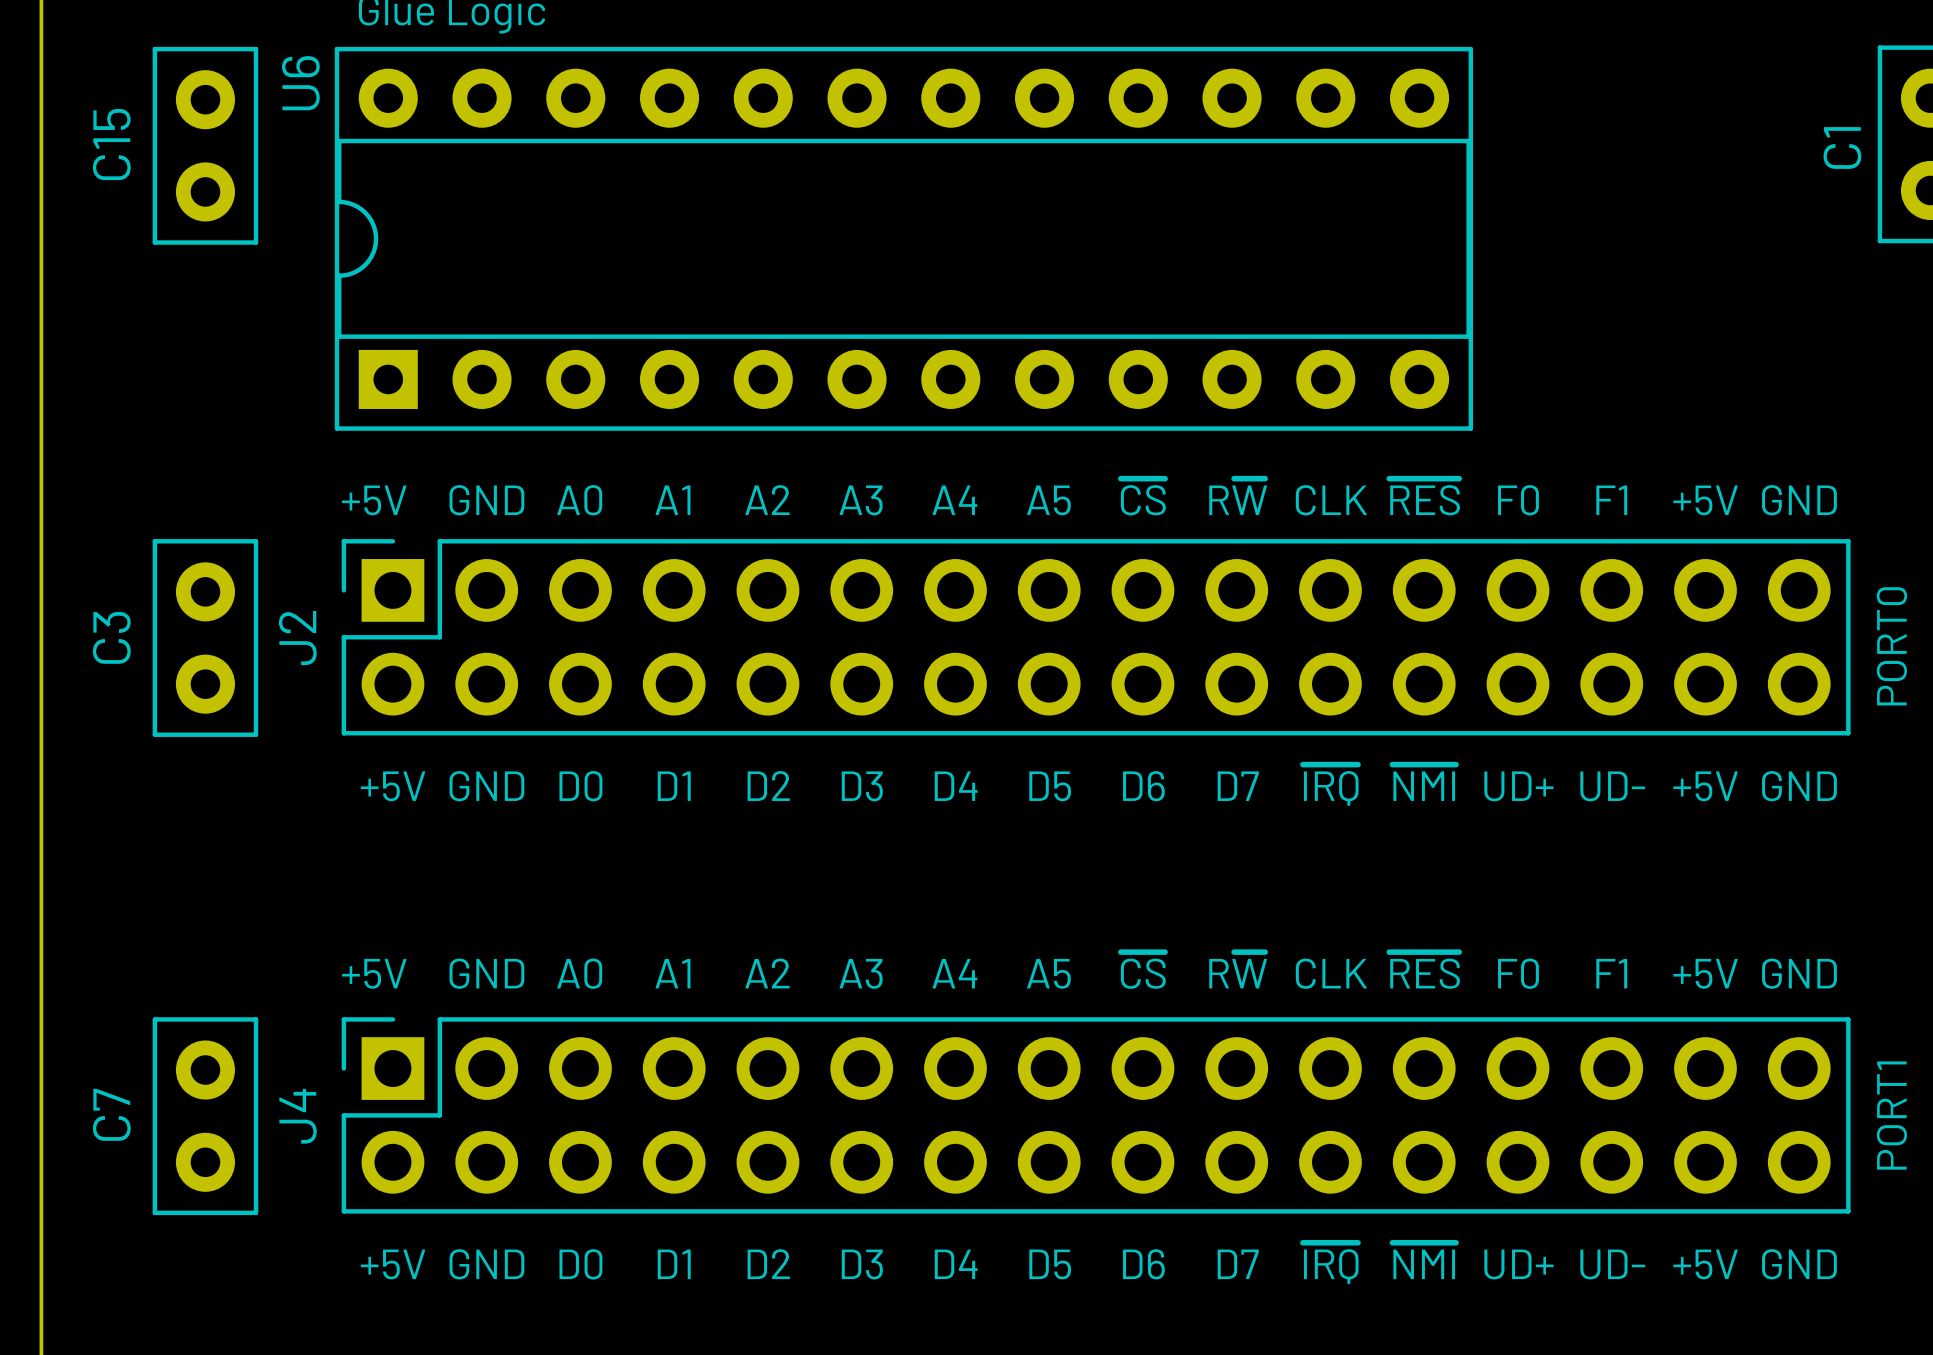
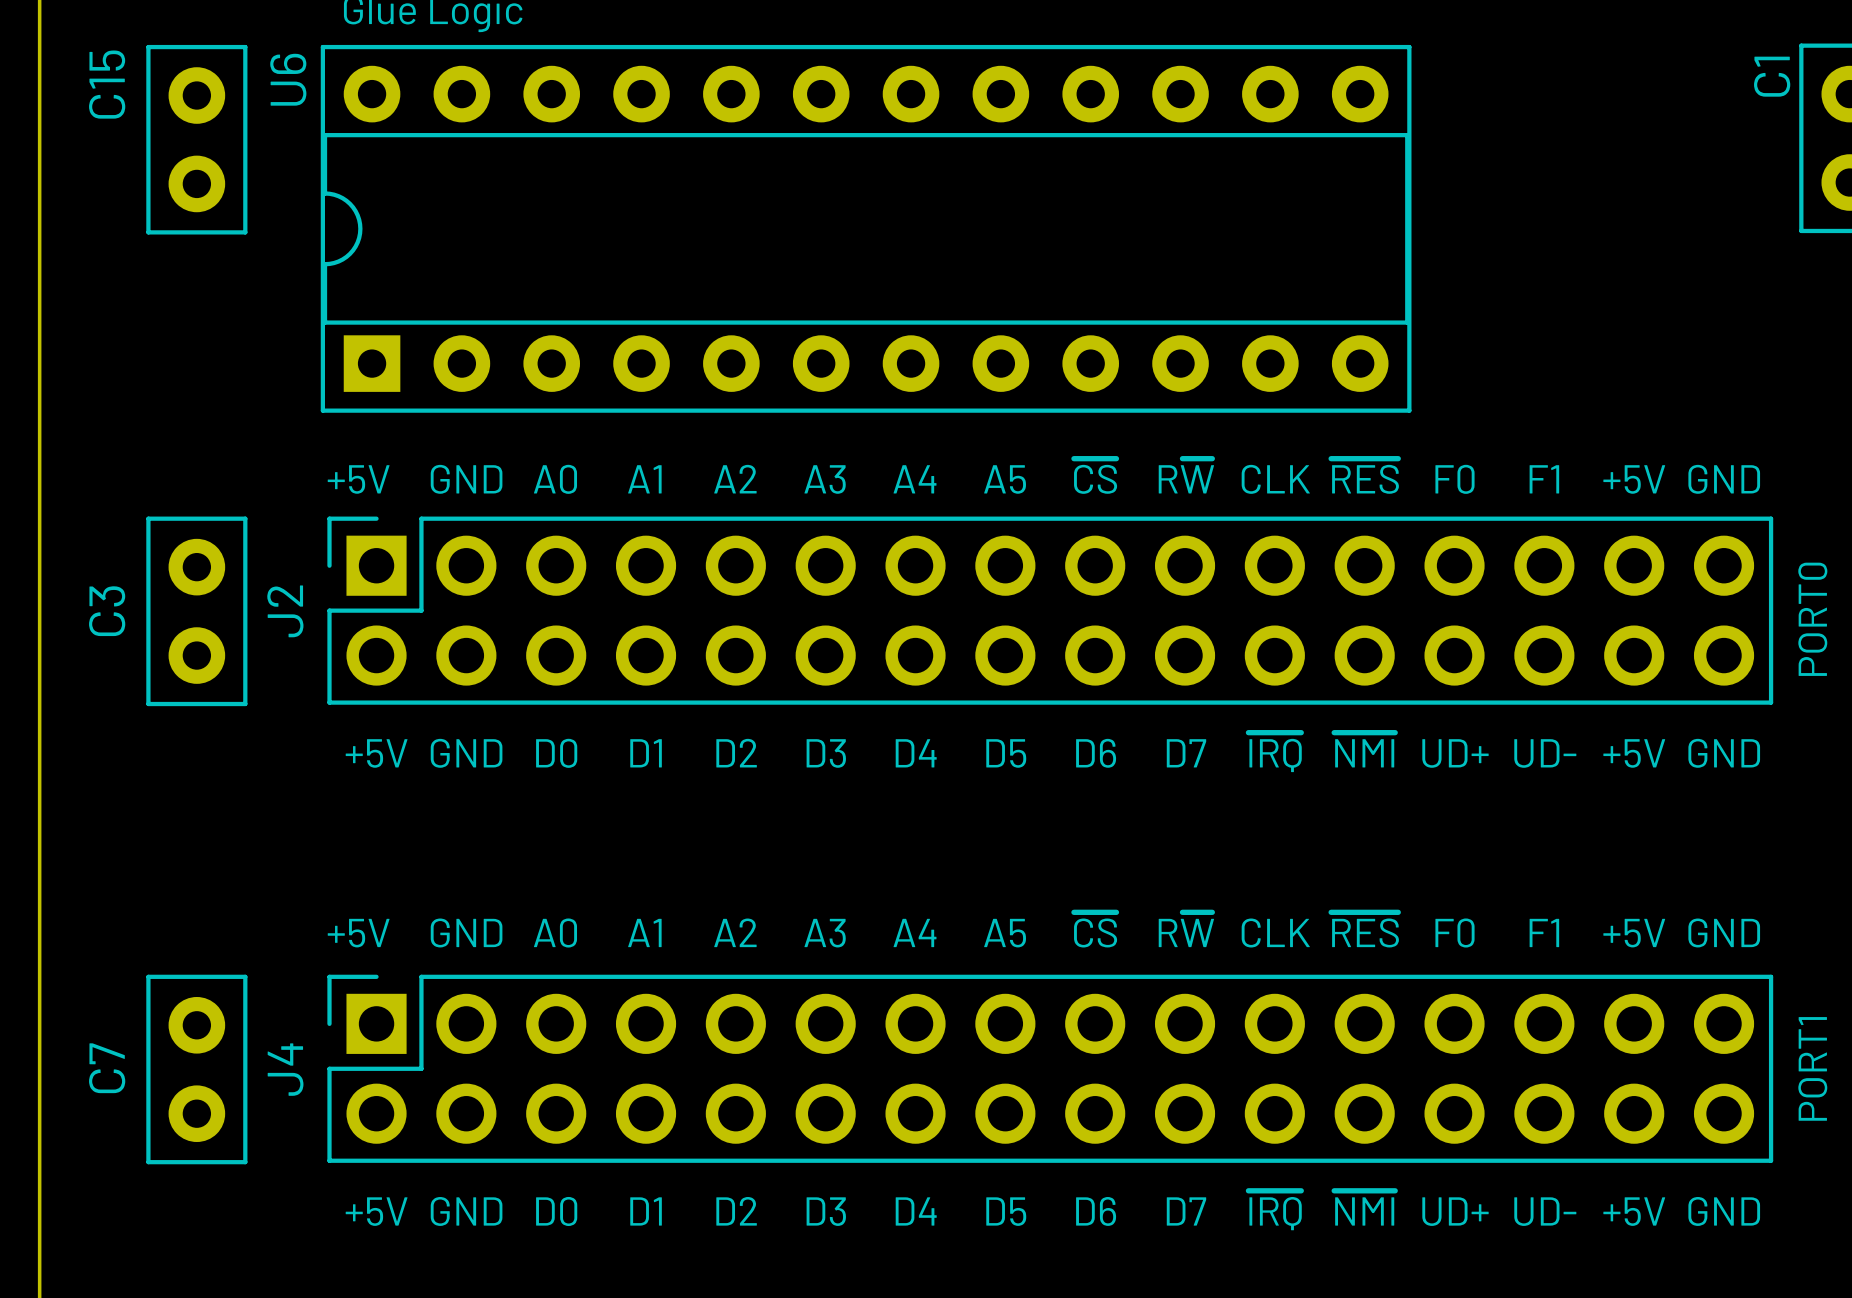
C15 name position: C15 (111, 144) -> C15 (107, 84)
C1 name position: C1 (1842, 147) -> C1 (1772, 76)

